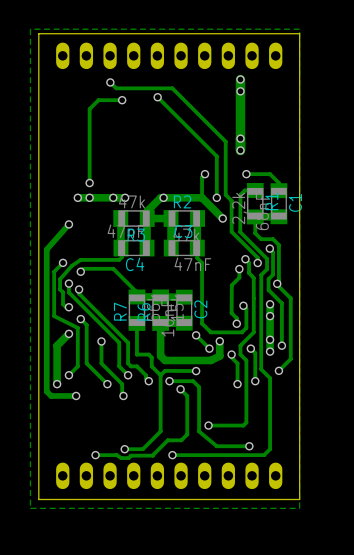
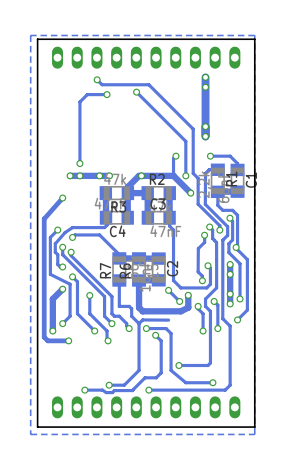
via: (196, 371) -> none

